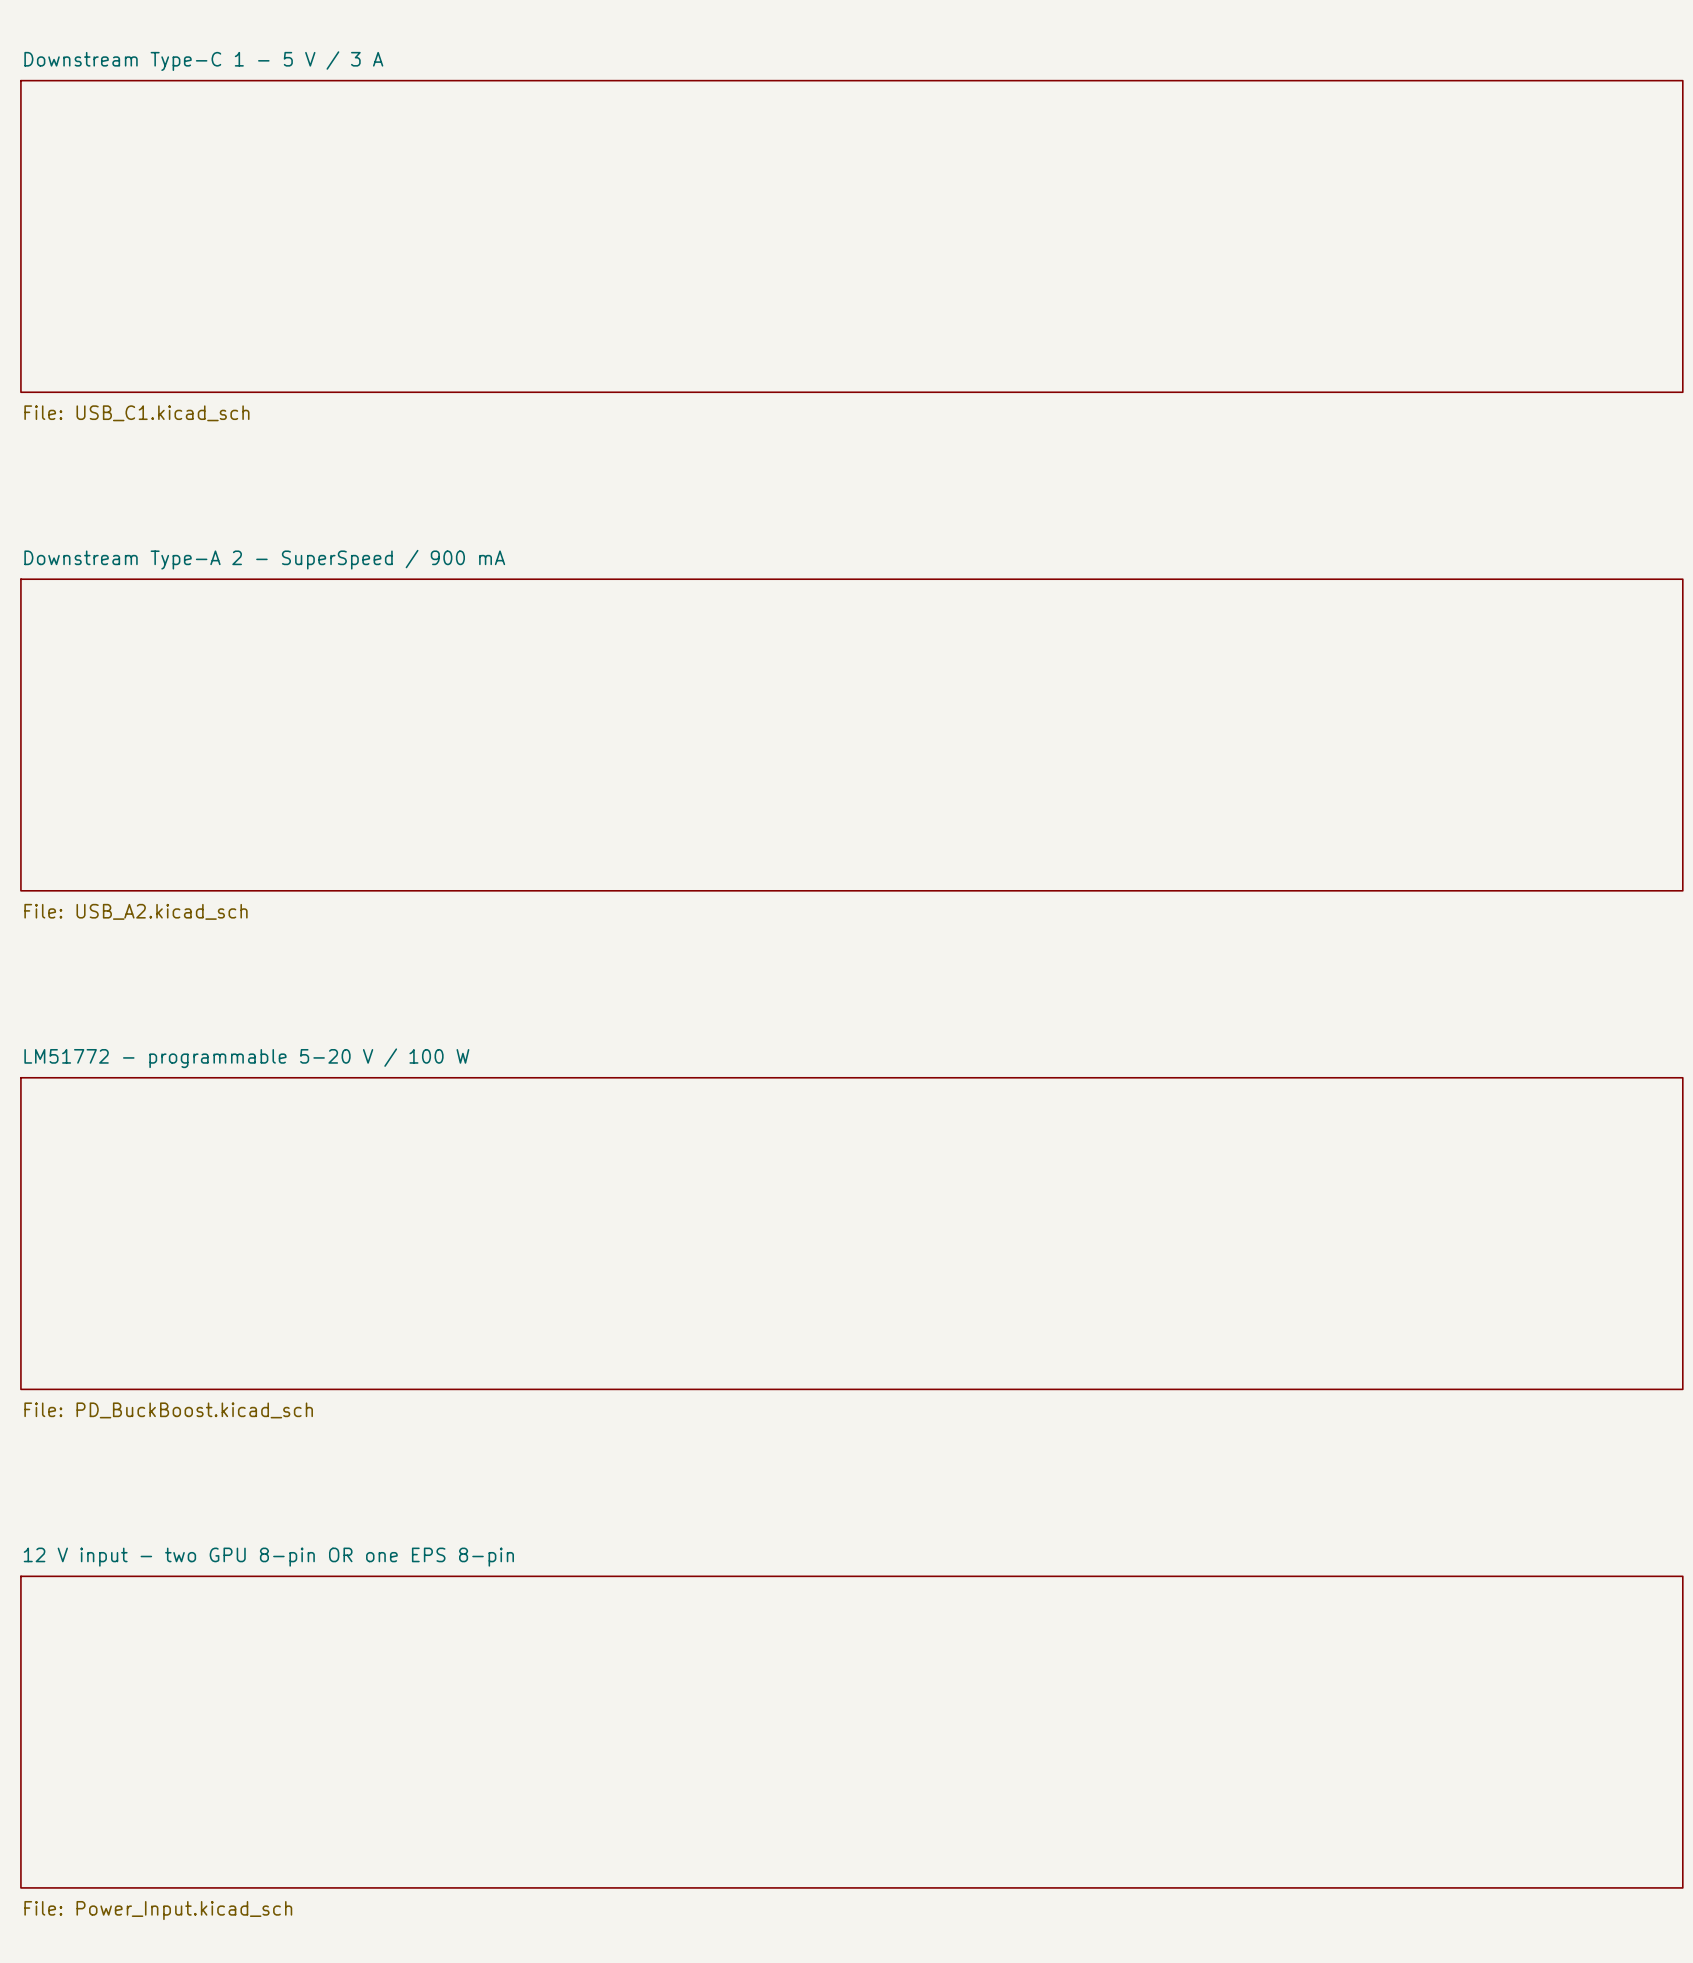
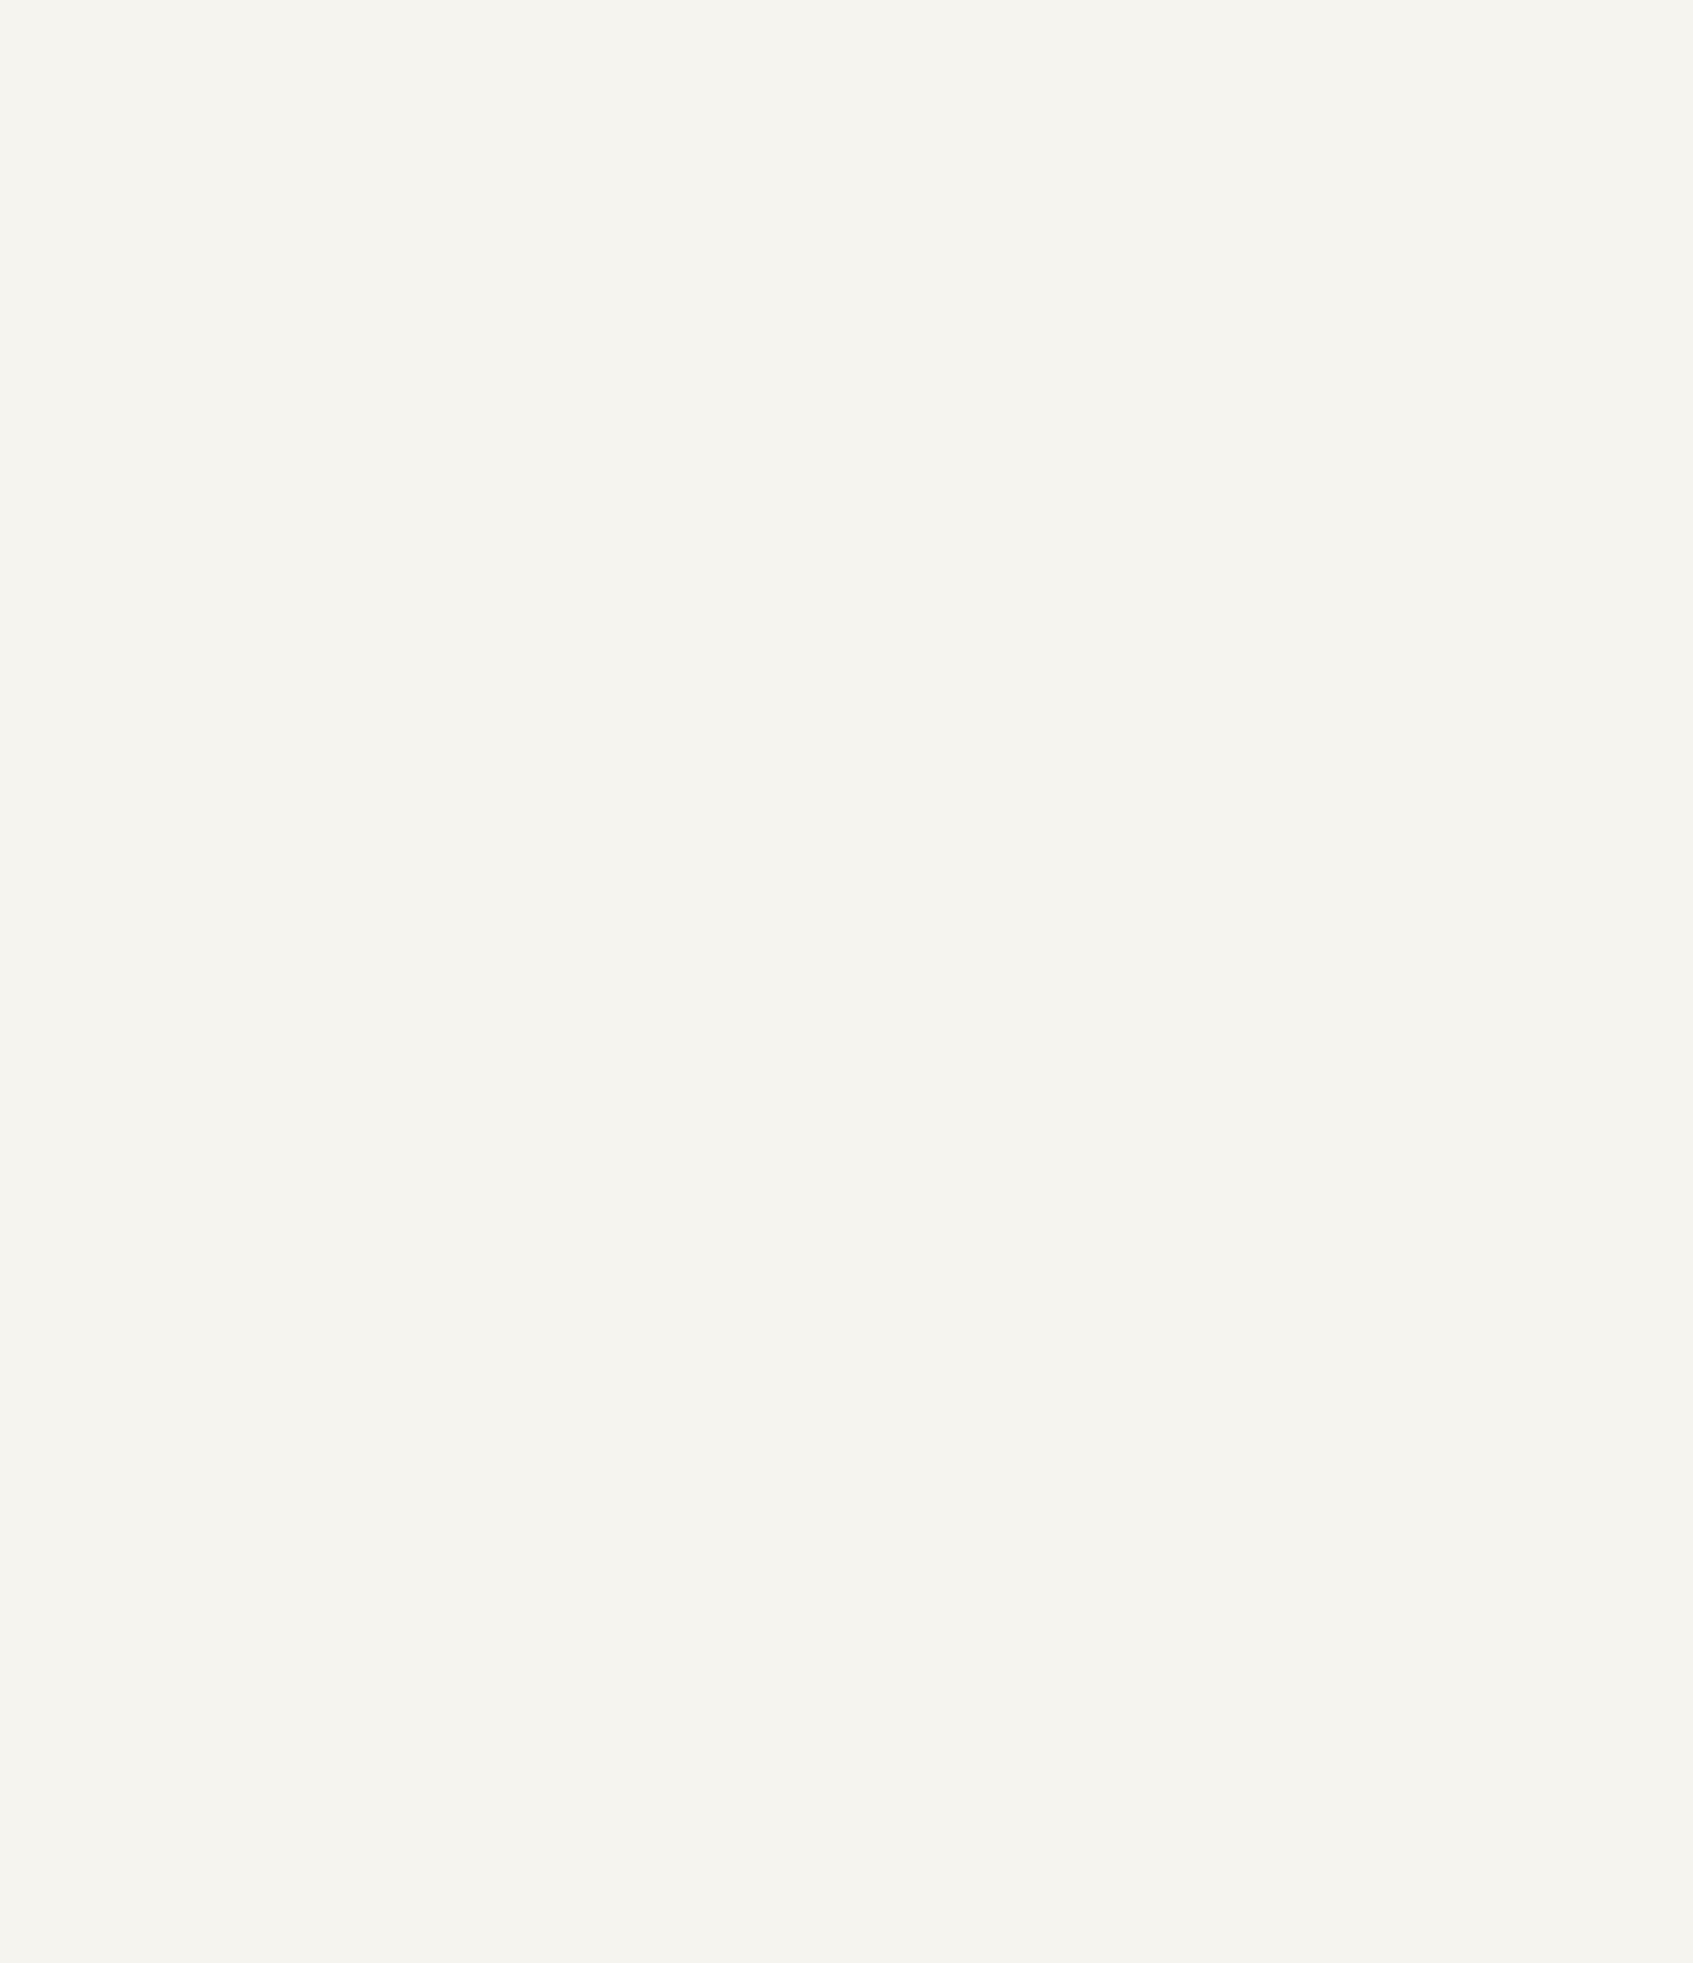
sheet Downstream Type-C 1 - 5 V / 3 A: File: USB_C1.kicad_sch (851, 236) -> none
sheet Downstream Type-A 2 - SuperSpeed / 900 mA: File: USB_A2.kicad_sch (851, 735) -> none
sheet LM51772 - programmable 5-20 V / 100 W: File: PD_BuckBoost.kicad_sch (851, 1233) -> none
sheet 12 V input - two GPU 8-pin OR one EPS 8-pin: File: Power_Input.kicad_sch (851, 1732) -> none

